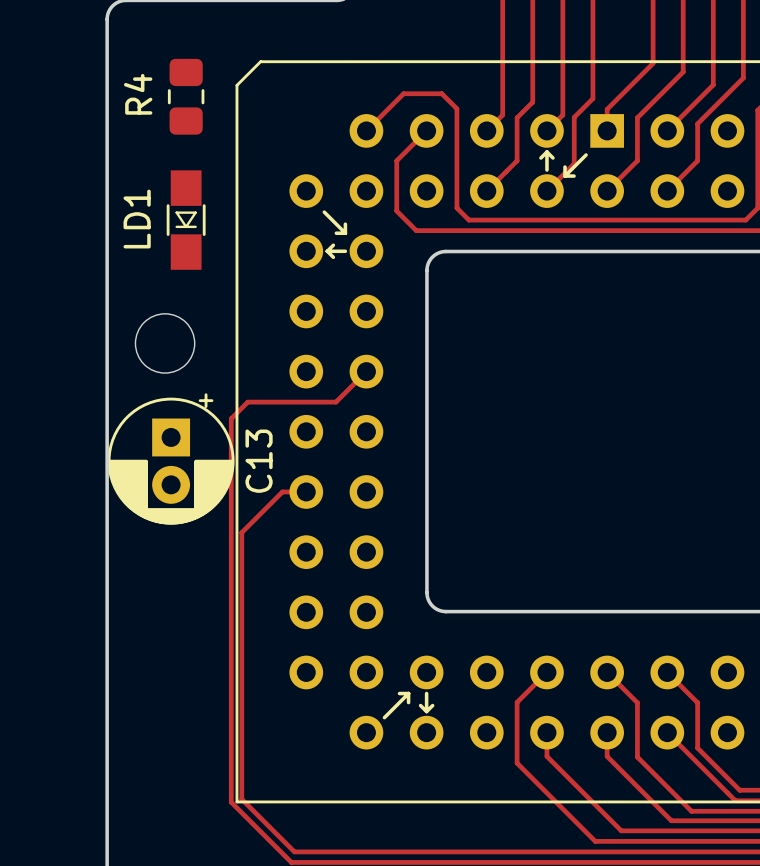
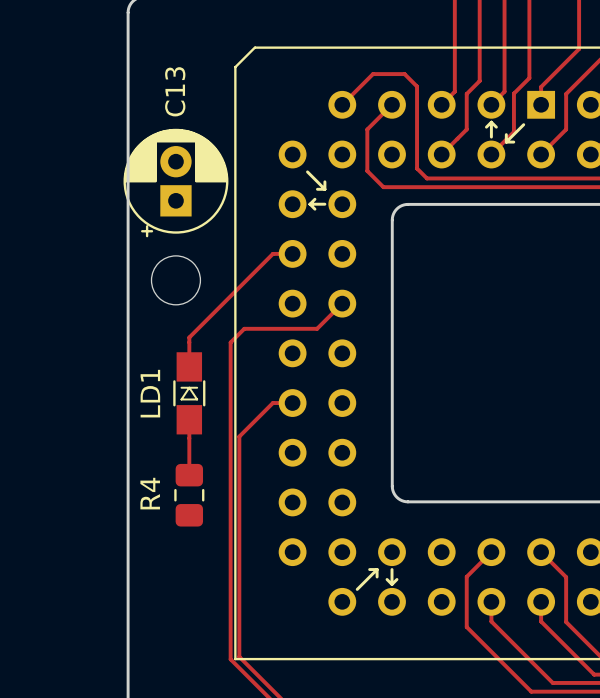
R4 position: (186, 96) -> (189, 495)
LD1 rotation: 0° (186, 220) -> 180° (189, 393)
LD1 position: (186, 220) -> (189, 393)
track: none -> (292, 253) (272, 253) (189, 337) (189, 366)
C13 rotation: 0° (171, 458) -> 180° (175, 183)
C13 position: (171, 458) -> (175, 183)
C13 name position: C13 (259, 461) -> C13 (175, 91)
track: none -> (189, 419) (189, 475)

